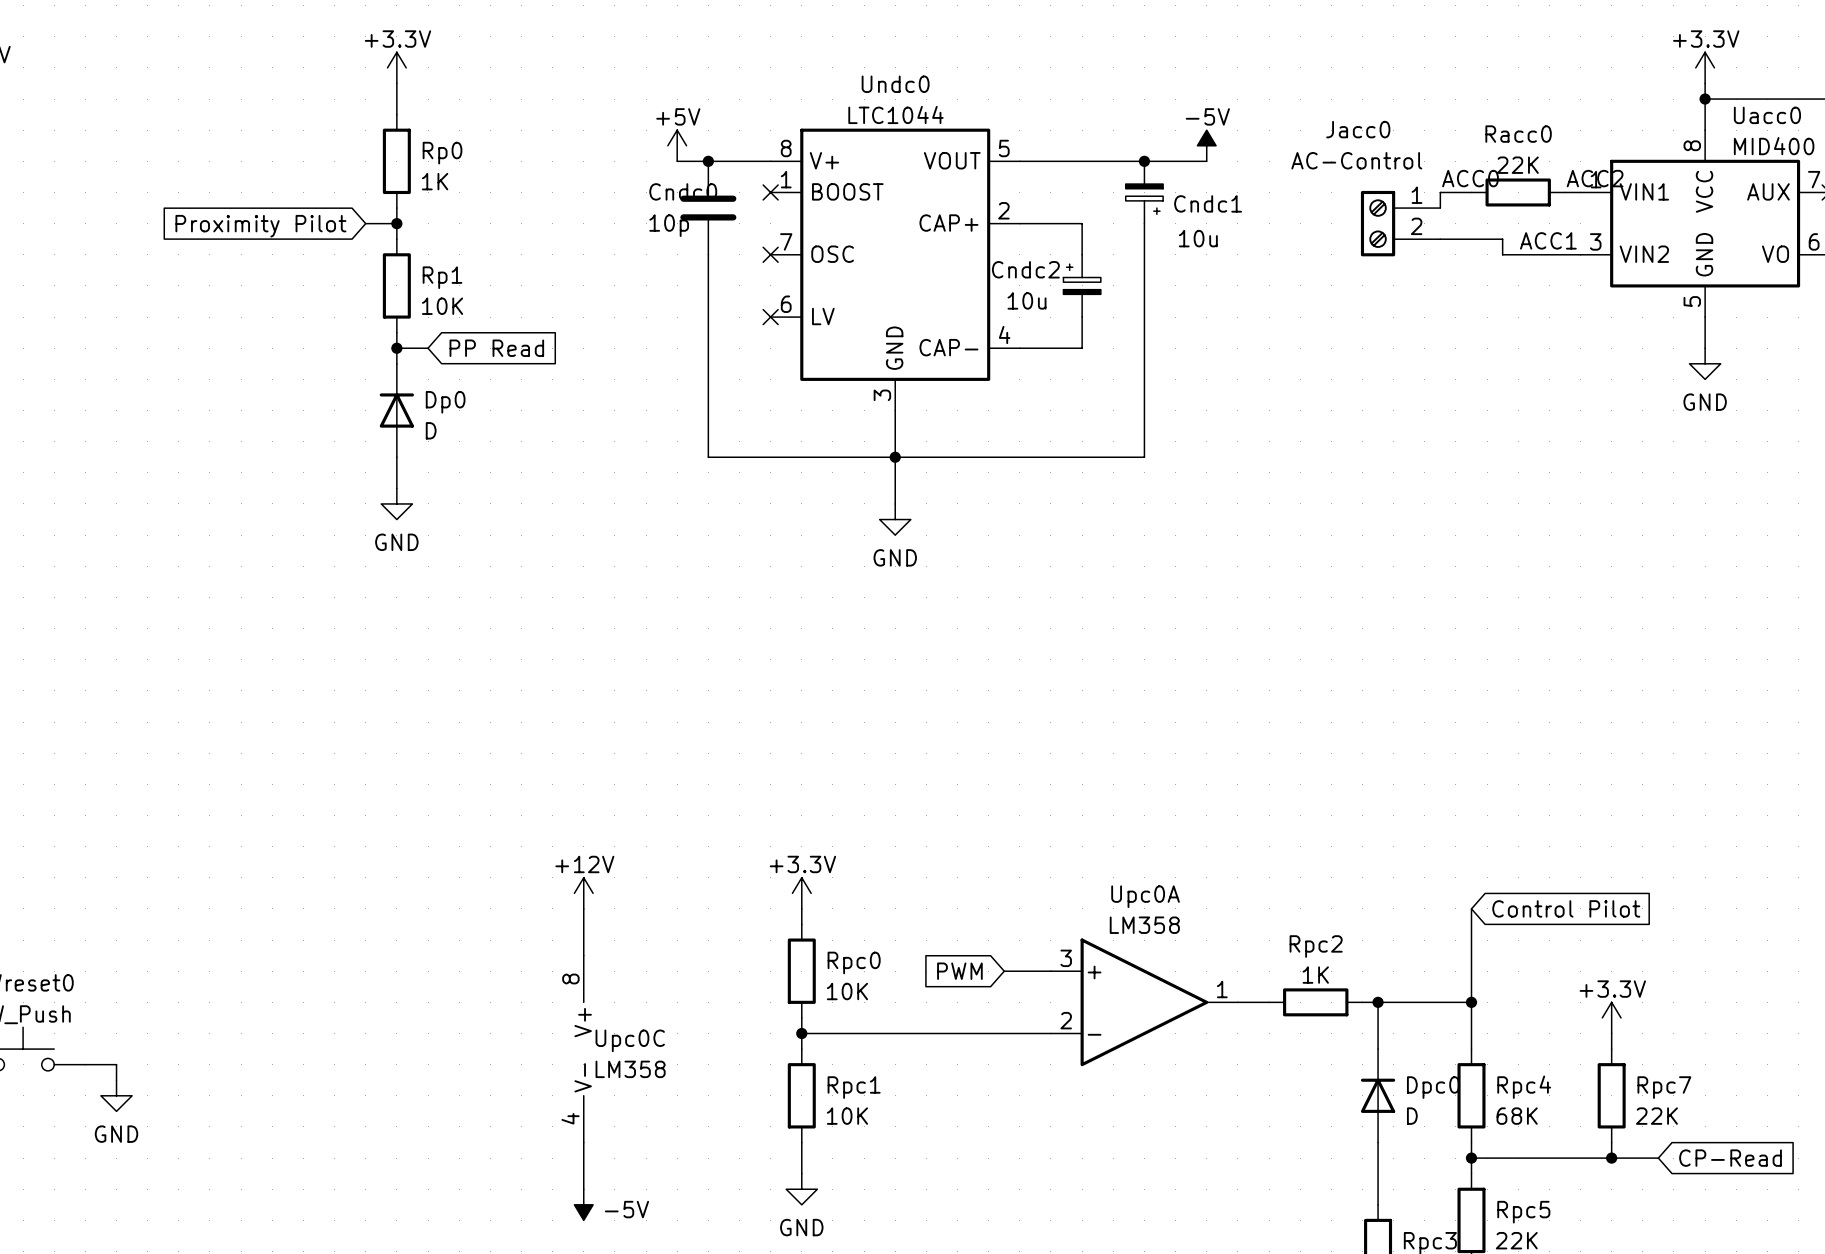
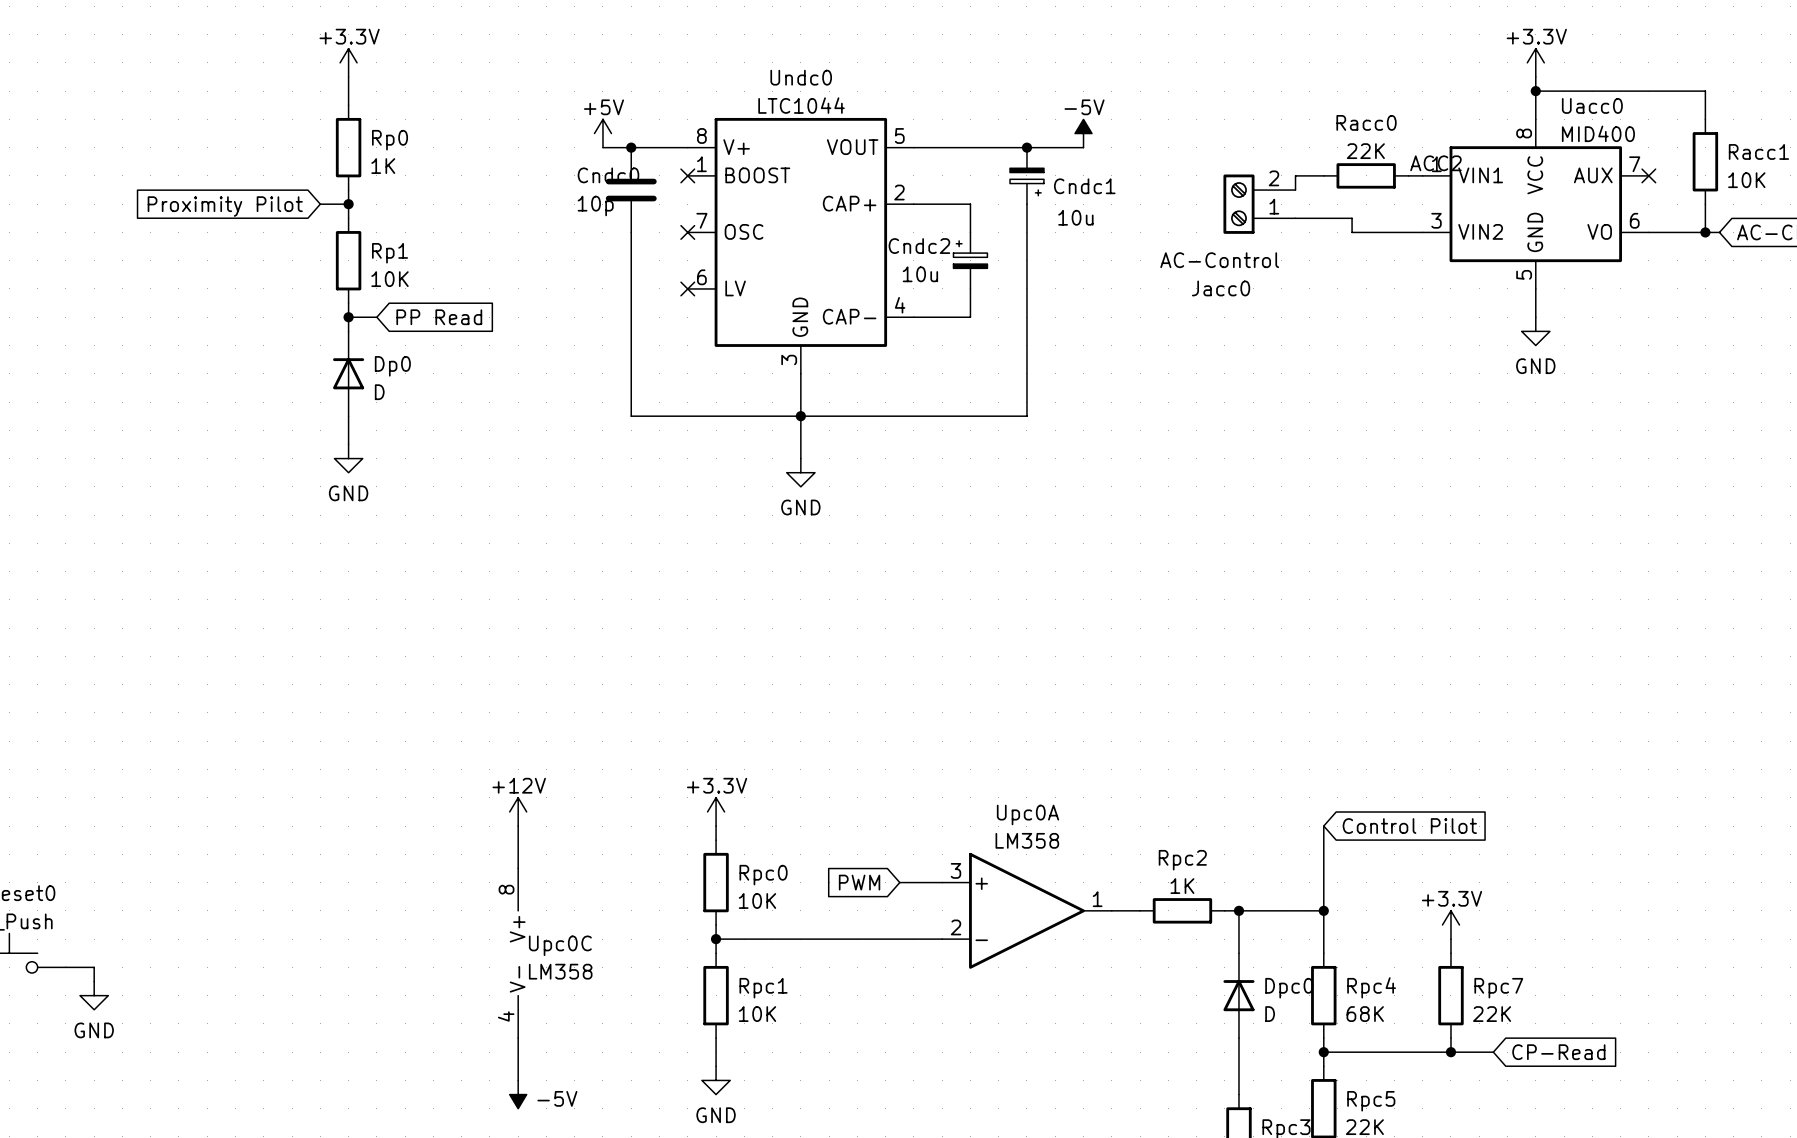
label: ACC0 (1470, 178) -> none
Jacc0 flip: as is (1378, 223) -> up-down (1238, 204)
label: ACC1 (1548, 240) -> none

